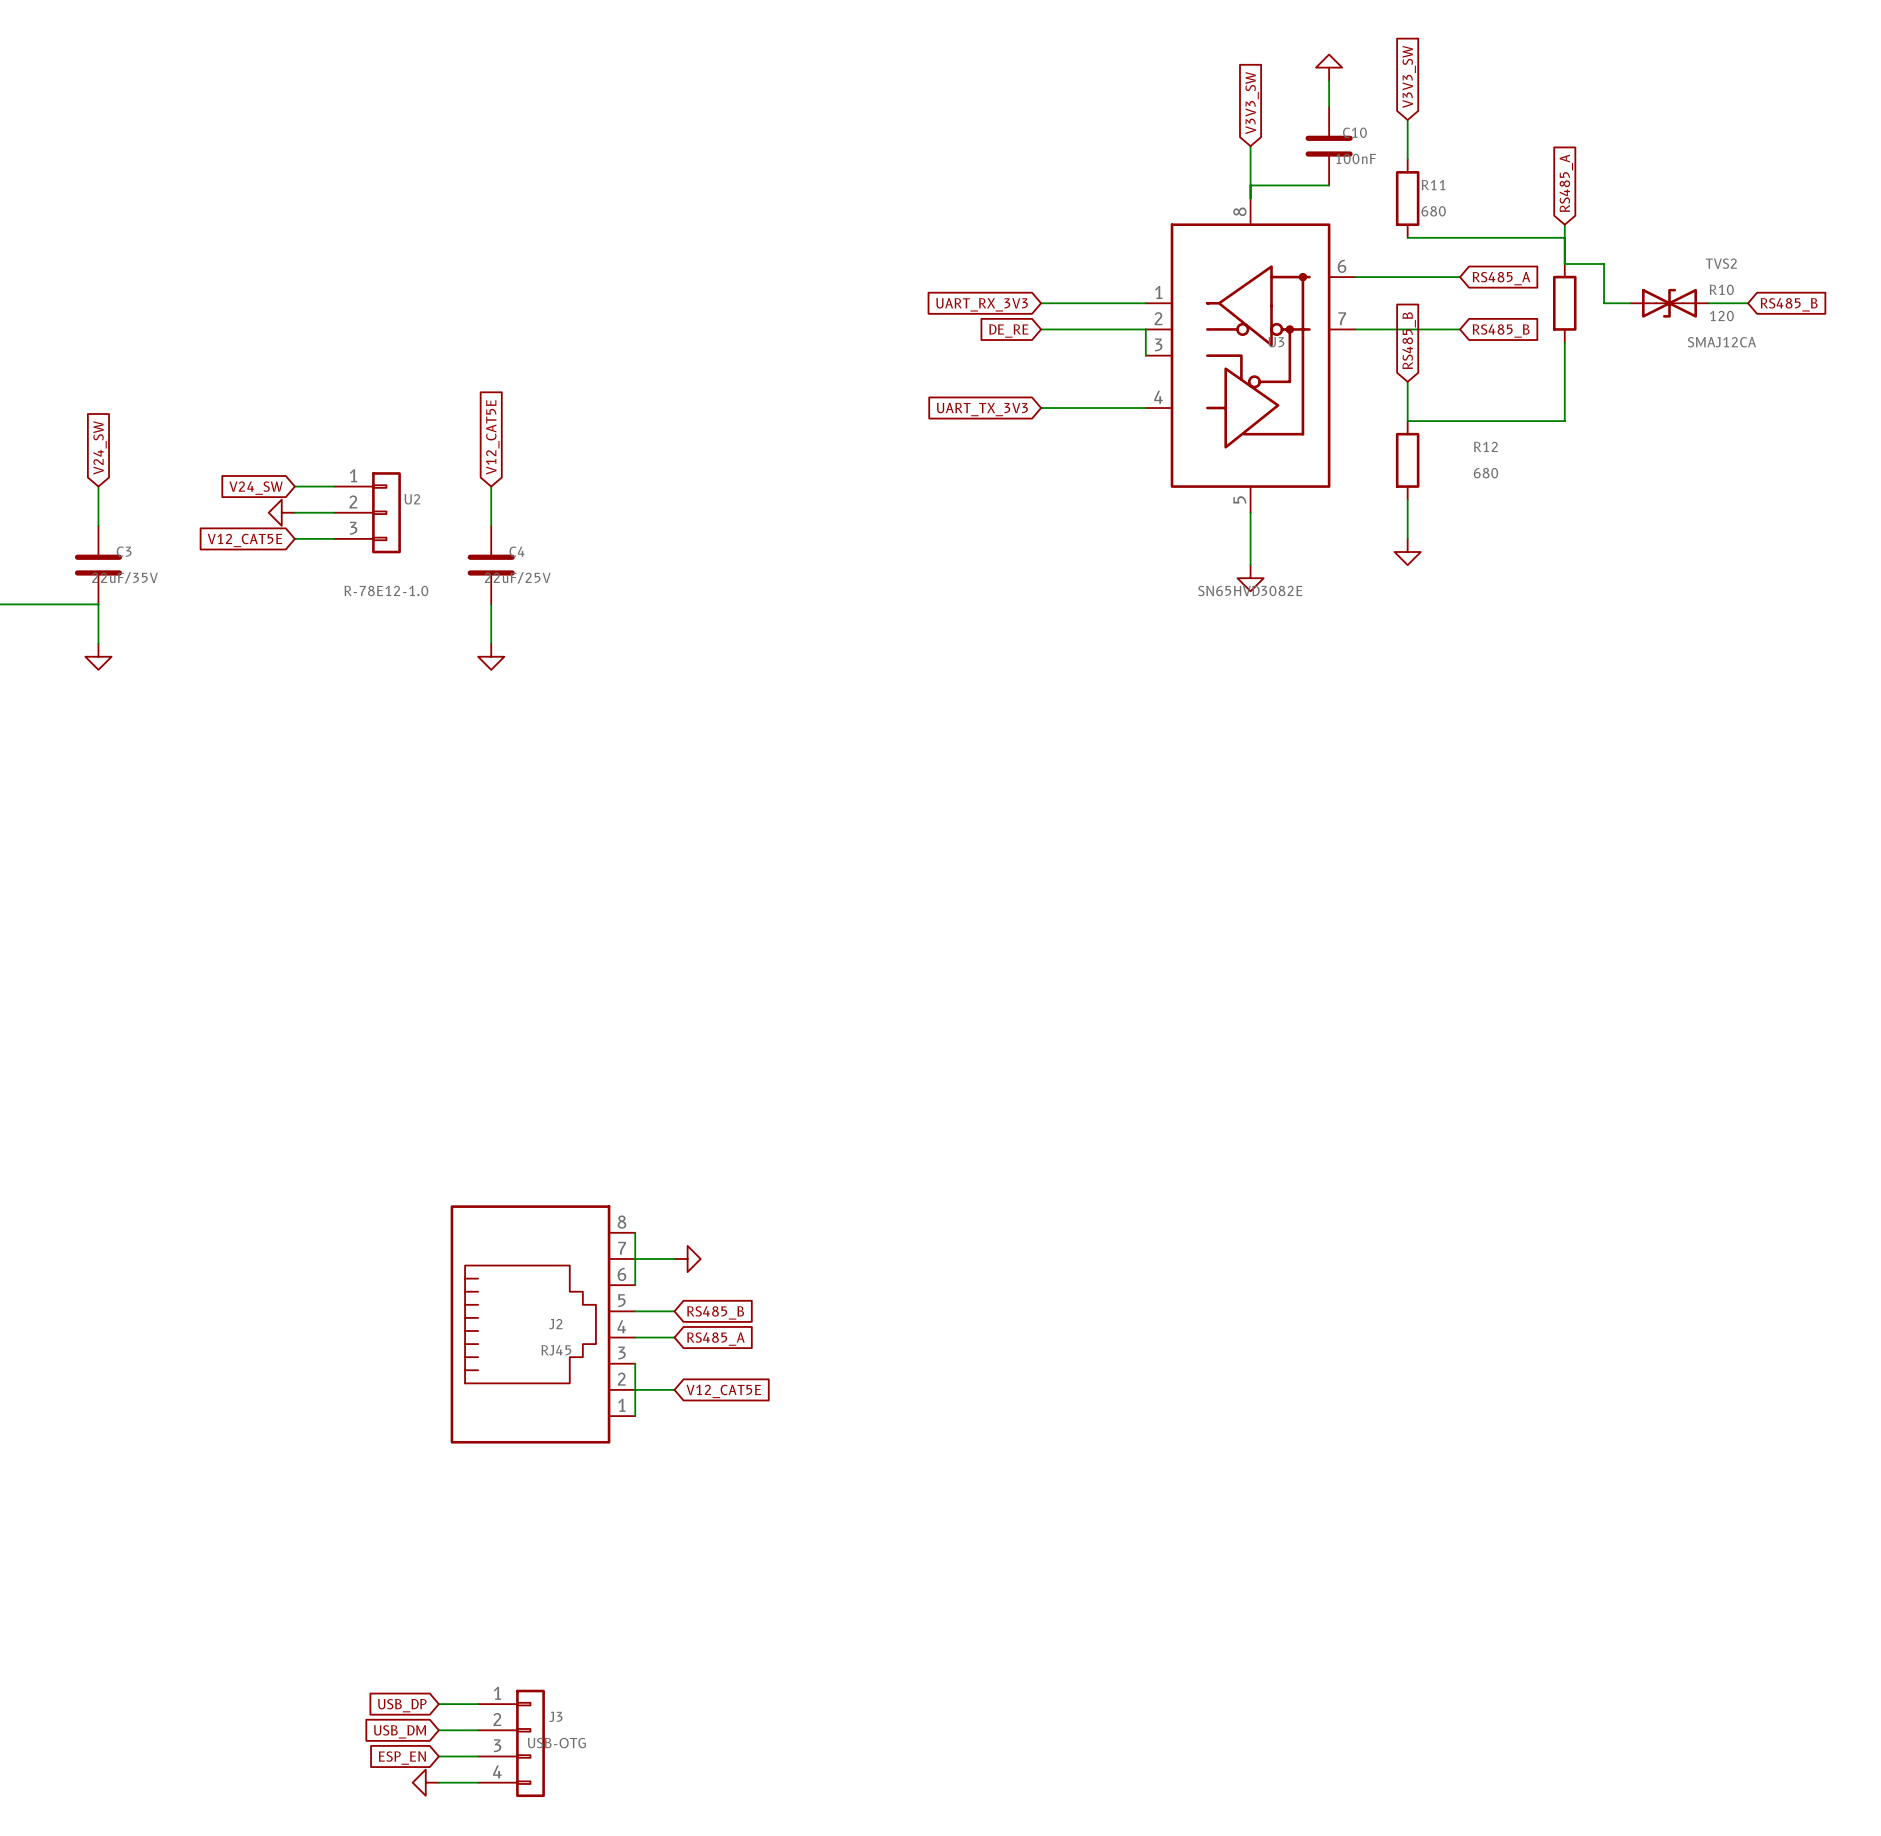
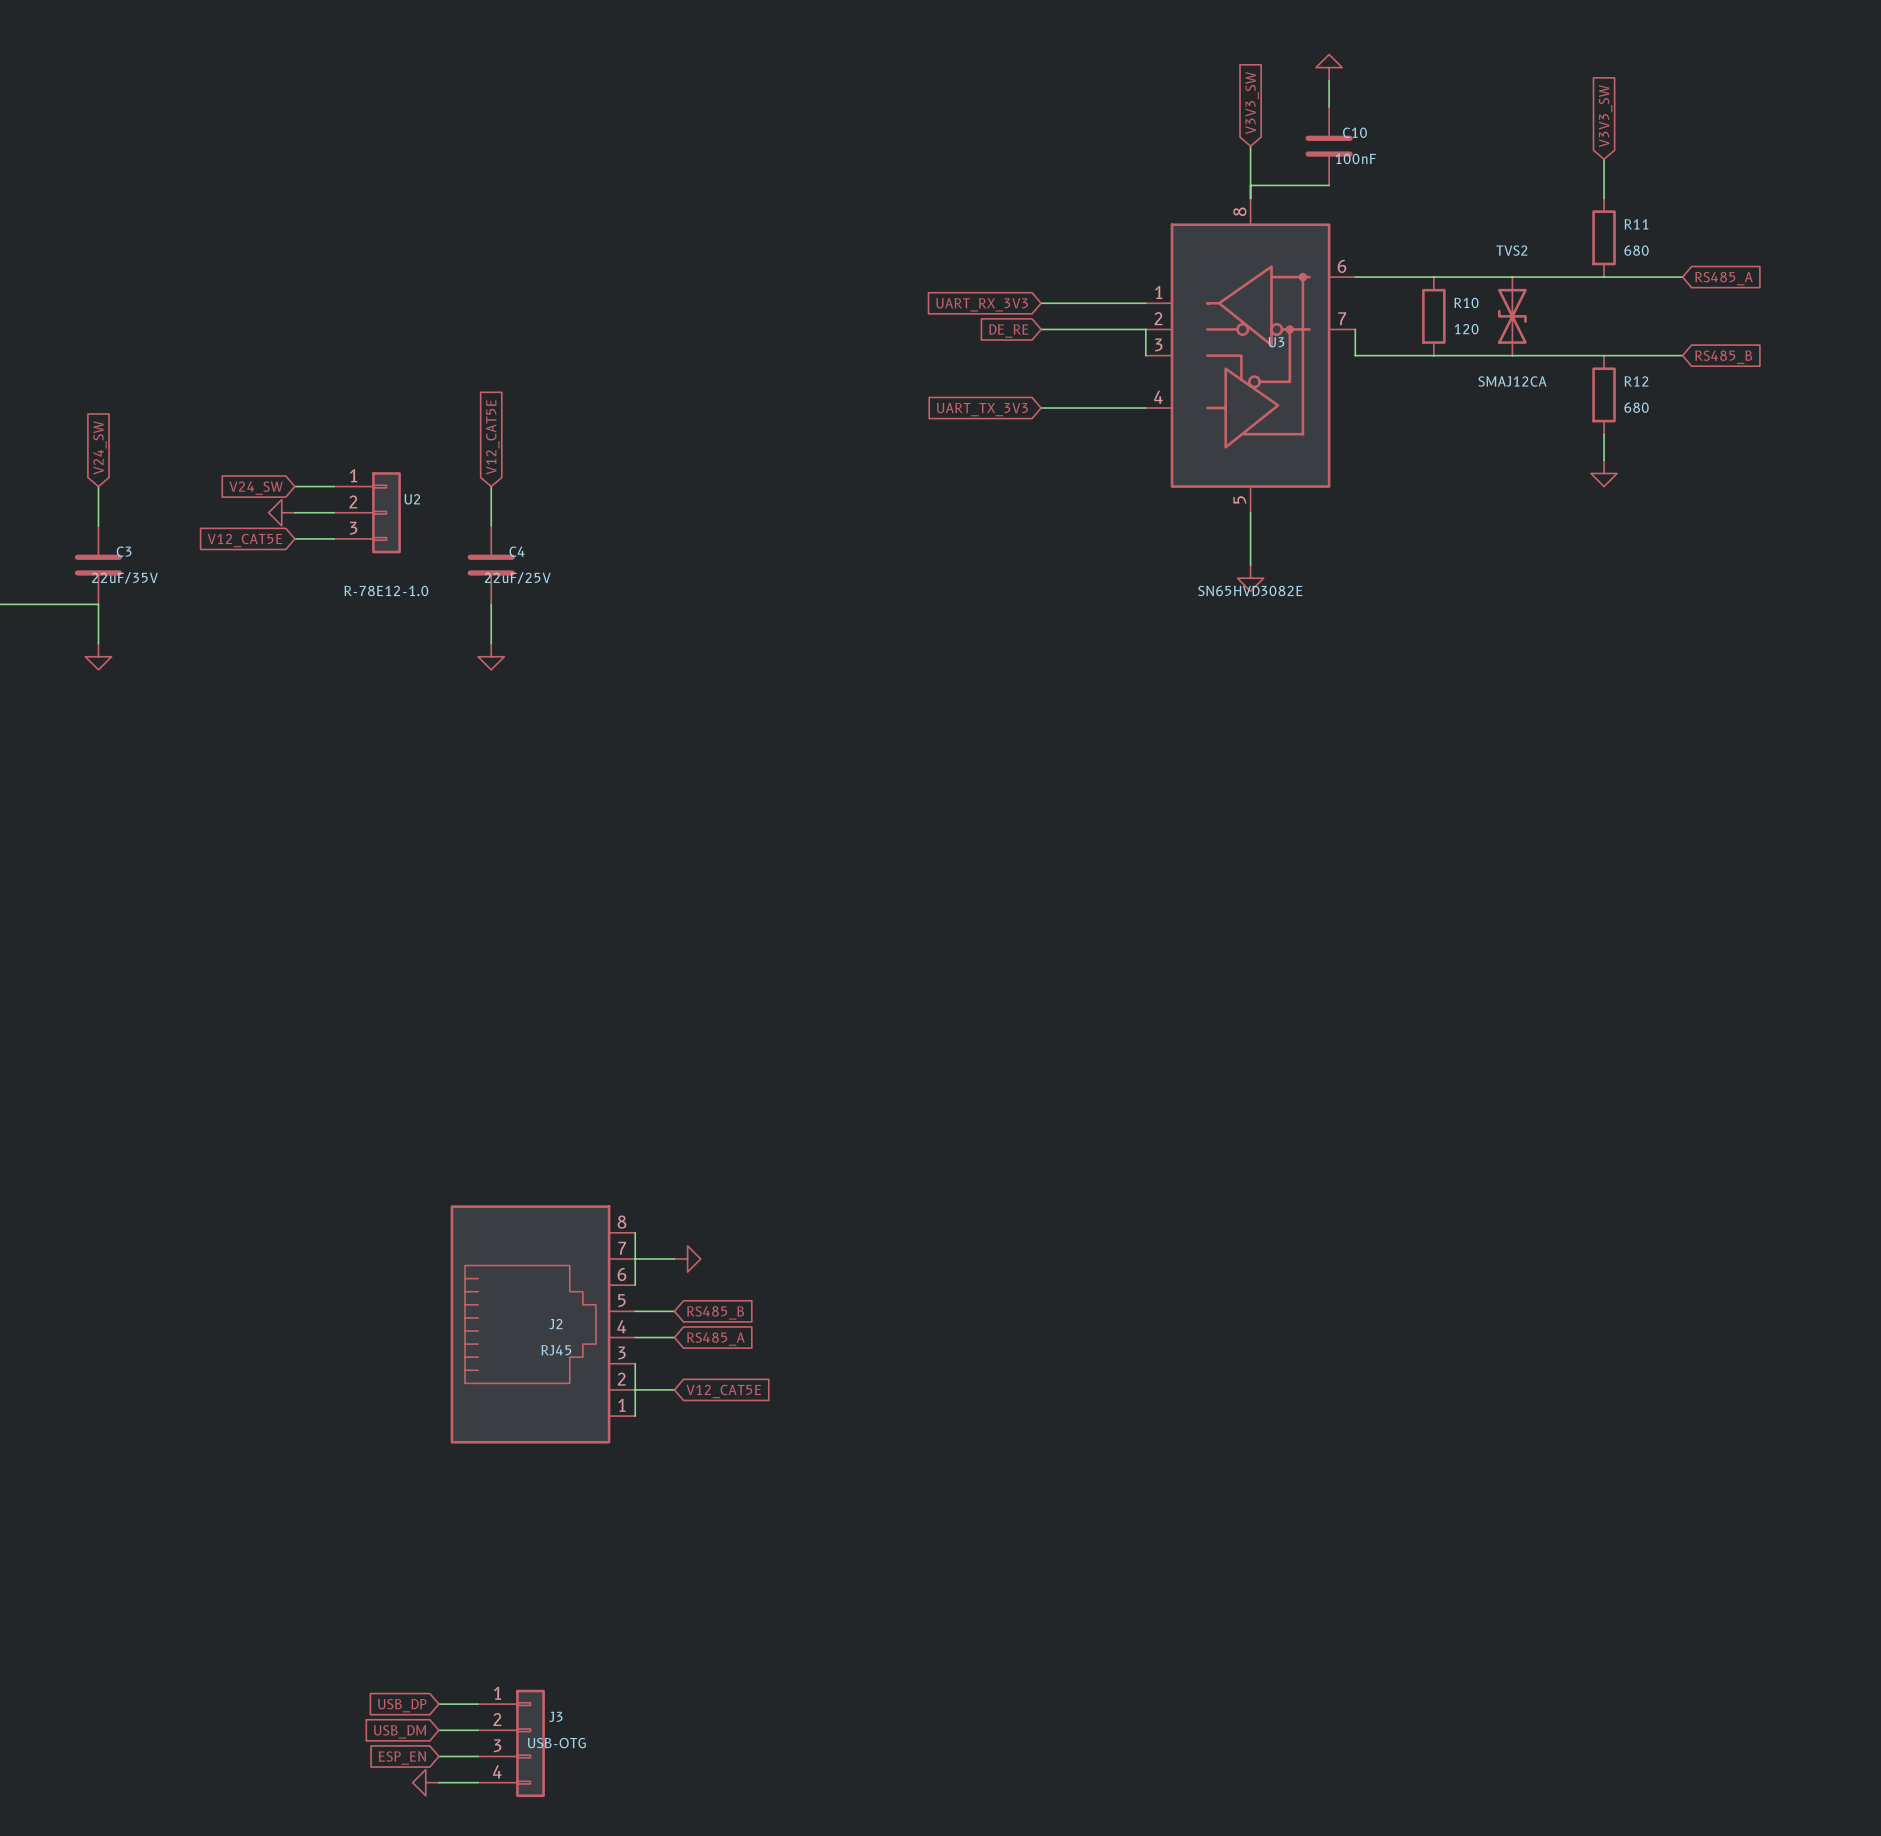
global label position: V3V3_SW (1409, 76) -> V3V3_SW (1605, 116)
wire: (1407, 119) (1407, 159) -> (1604, 159) (1604, 198)
global label: RS485_A (1566, 183) -> none
R11 name position: R11 (1433, 185) -> R11 (1636, 224)
R11 position: (1407, 198) -> (1604, 237)
R11 value position: 680 (1433, 211) -> 680 (1636, 250)
wire: (1564, 224) (1564, 263) (1604, 263) (1604, 303) (1630, 303) -> none
wire: (1407, 237) (1564, 237) -> none
TVS2 name position: TVS2 (1721, 263) -> TVS2 (1511, 250)
wire: none -> (1460, 277) (1682, 277)
global label: RS485_A (1501, 278) -> none
global label: none -> RS485_A (1724, 278)
R10 name position: R10 (1721, 289) -> R10 (1466, 302)
R10 position: (1564, 303) -> (1433, 316)
TVS2 rotation: 0° (1669, 303) -> 90° clockwise (1512, 316)
TVS2 position: (1669, 303) -> (1512, 316)
wire: (1708, 303) (1748, 303) -> none
global label position: RS485_B (1789, 304) -> RS485_B (1723, 357)
R10 value position: 120 (1721, 316) -> 120 (1466, 329)
wire: (1355, 329) (1460, 329) -> (1355, 329) (1355, 355) (1682, 355)
global label: RS485_B (1501, 331) -> none
global label: RS485_B (1409, 340) -> none
wire: (1564, 342) (1564, 421) (1407, 421) (1407, 381) -> none
TVS2 value position: SMAJ12CA (1721, 342) -> SMAJ12CA (1512, 381)
wire: none -> (1604, 434) (1604, 460)
R12 name position: R12 (1485, 446) -> R12 (1636, 381)
R12 position: (1407, 460) -> (1604, 394)
R12 value position: 680 (1485, 473) -> 680 (1636, 407)
wire: (1407, 499) (1407, 538) -> none
power symbol position: (1407, 552) -> (1604, 473)

